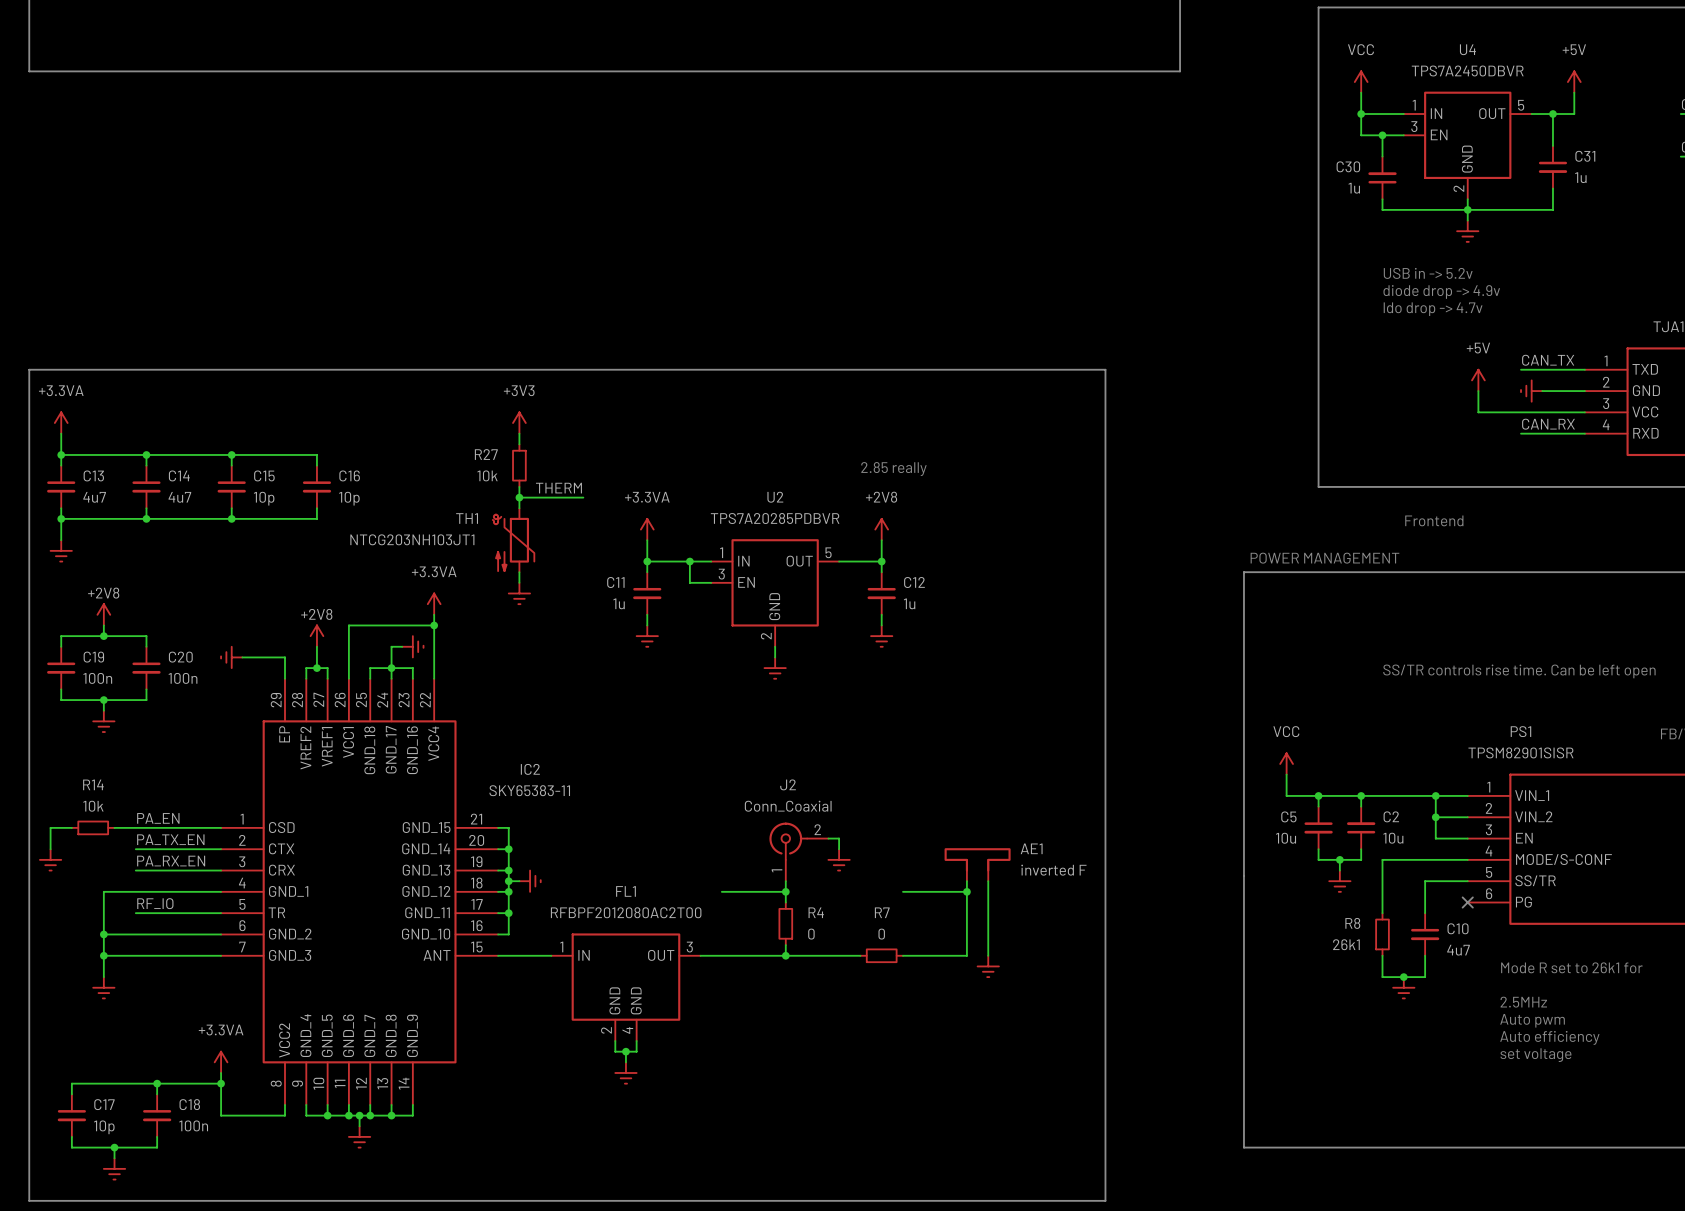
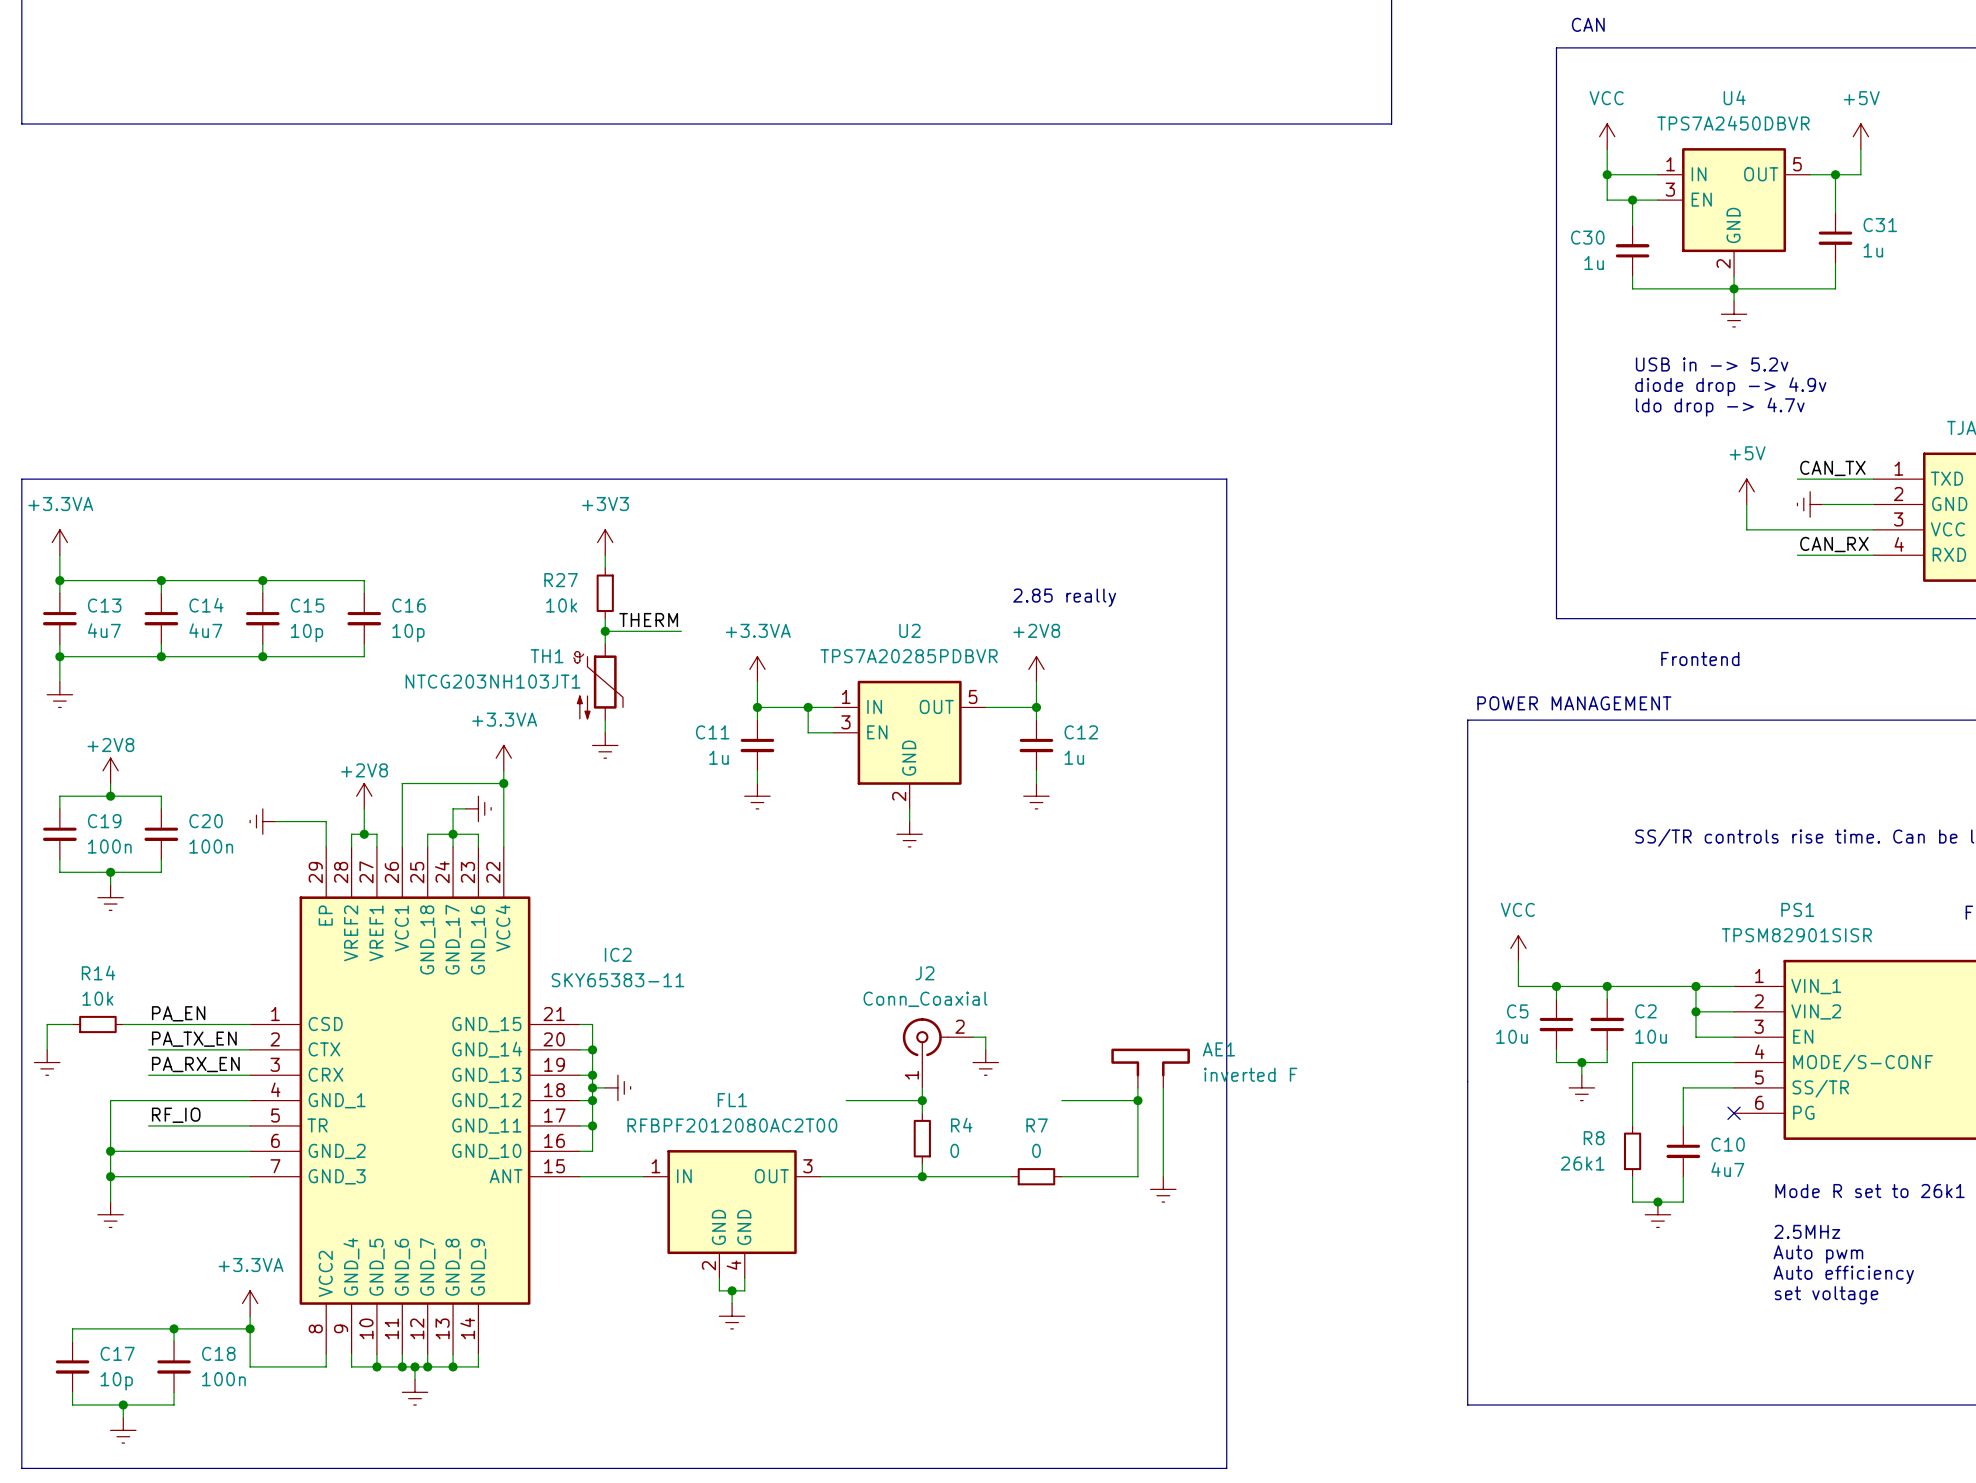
line: (1041, 369) (1105, 369) (1105, 1200) (1041, 1200) -> (1226, 479) (1226, 1468)

